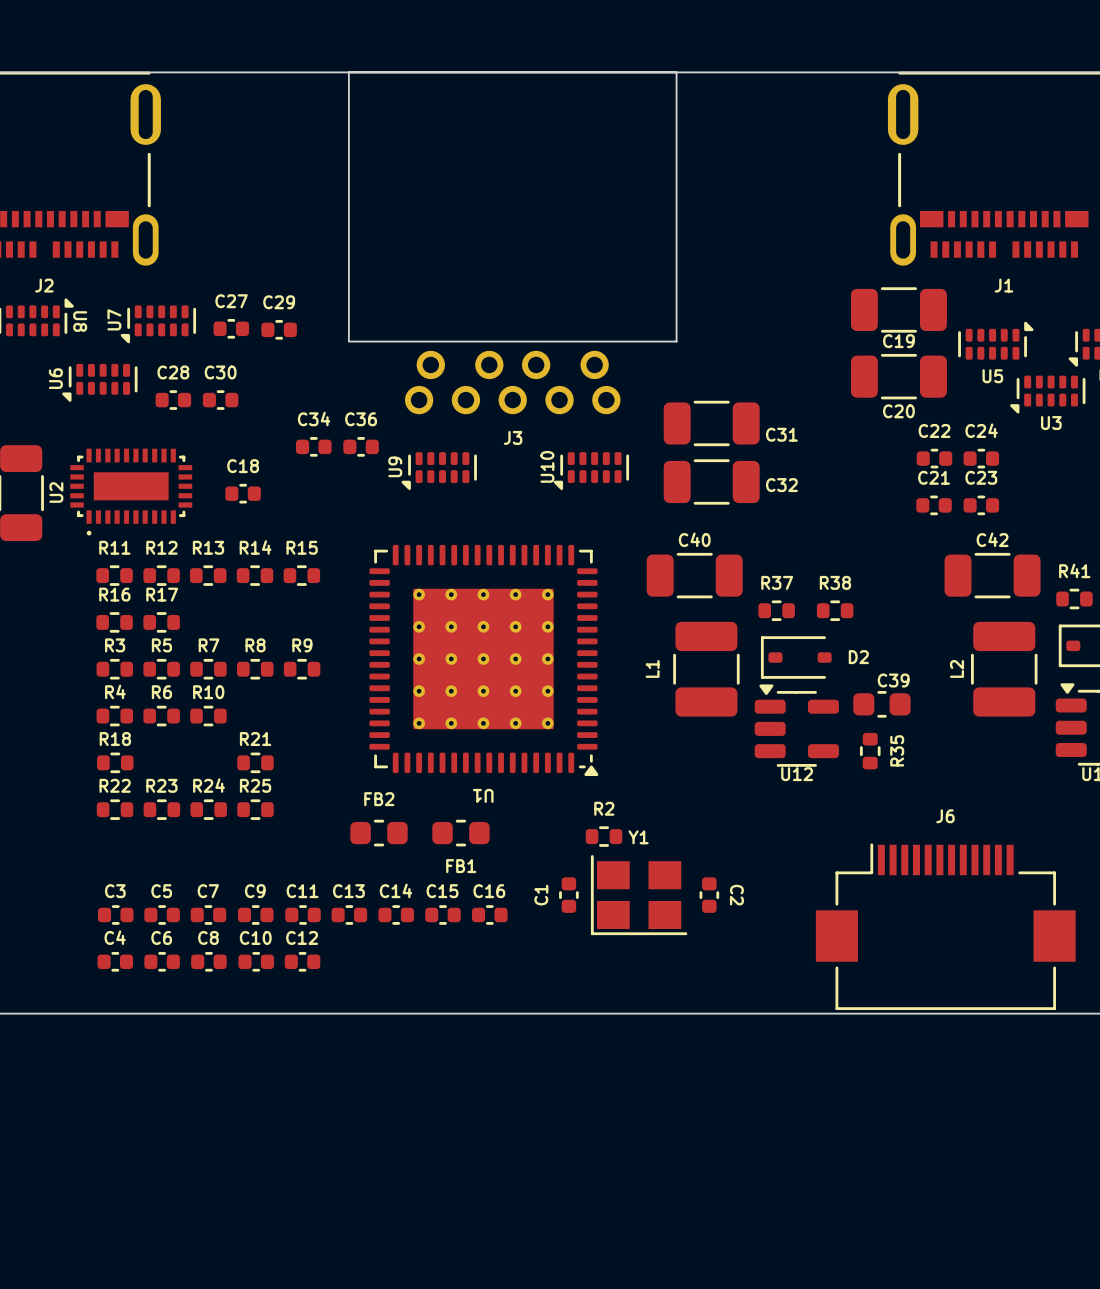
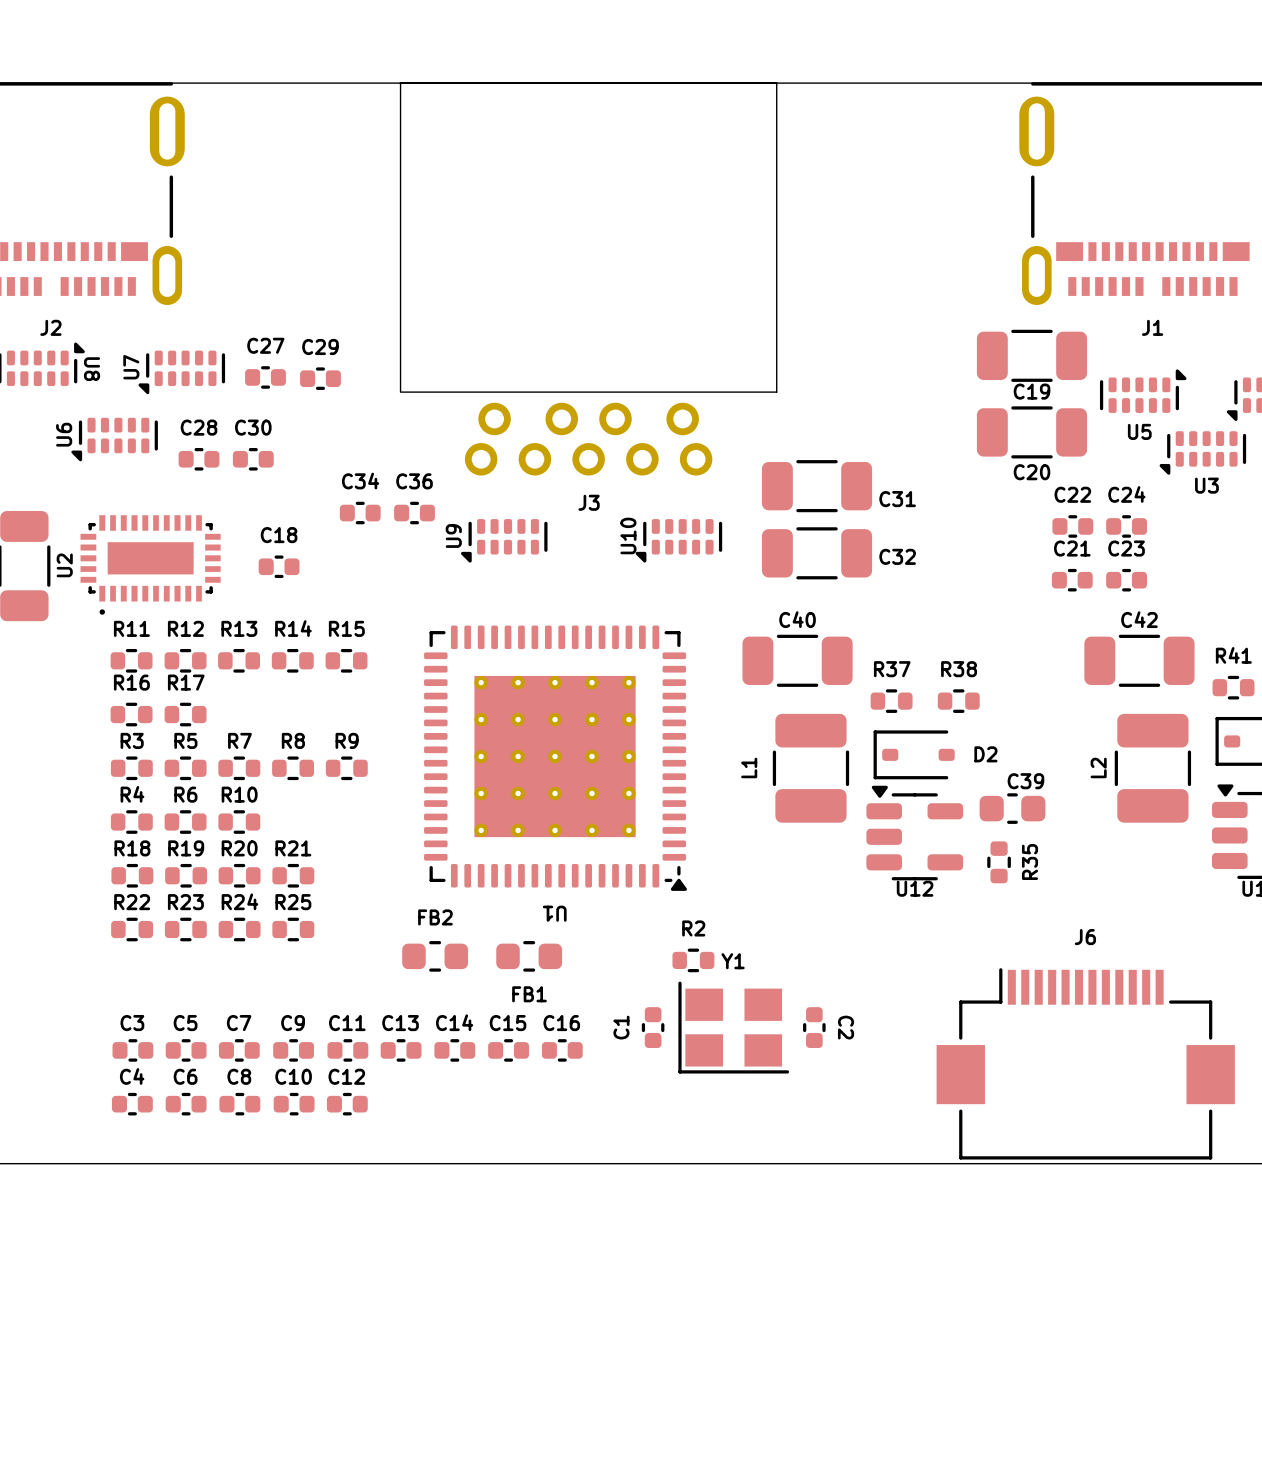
R19: none -> (186, 875)
R20: none -> (239, 875)

